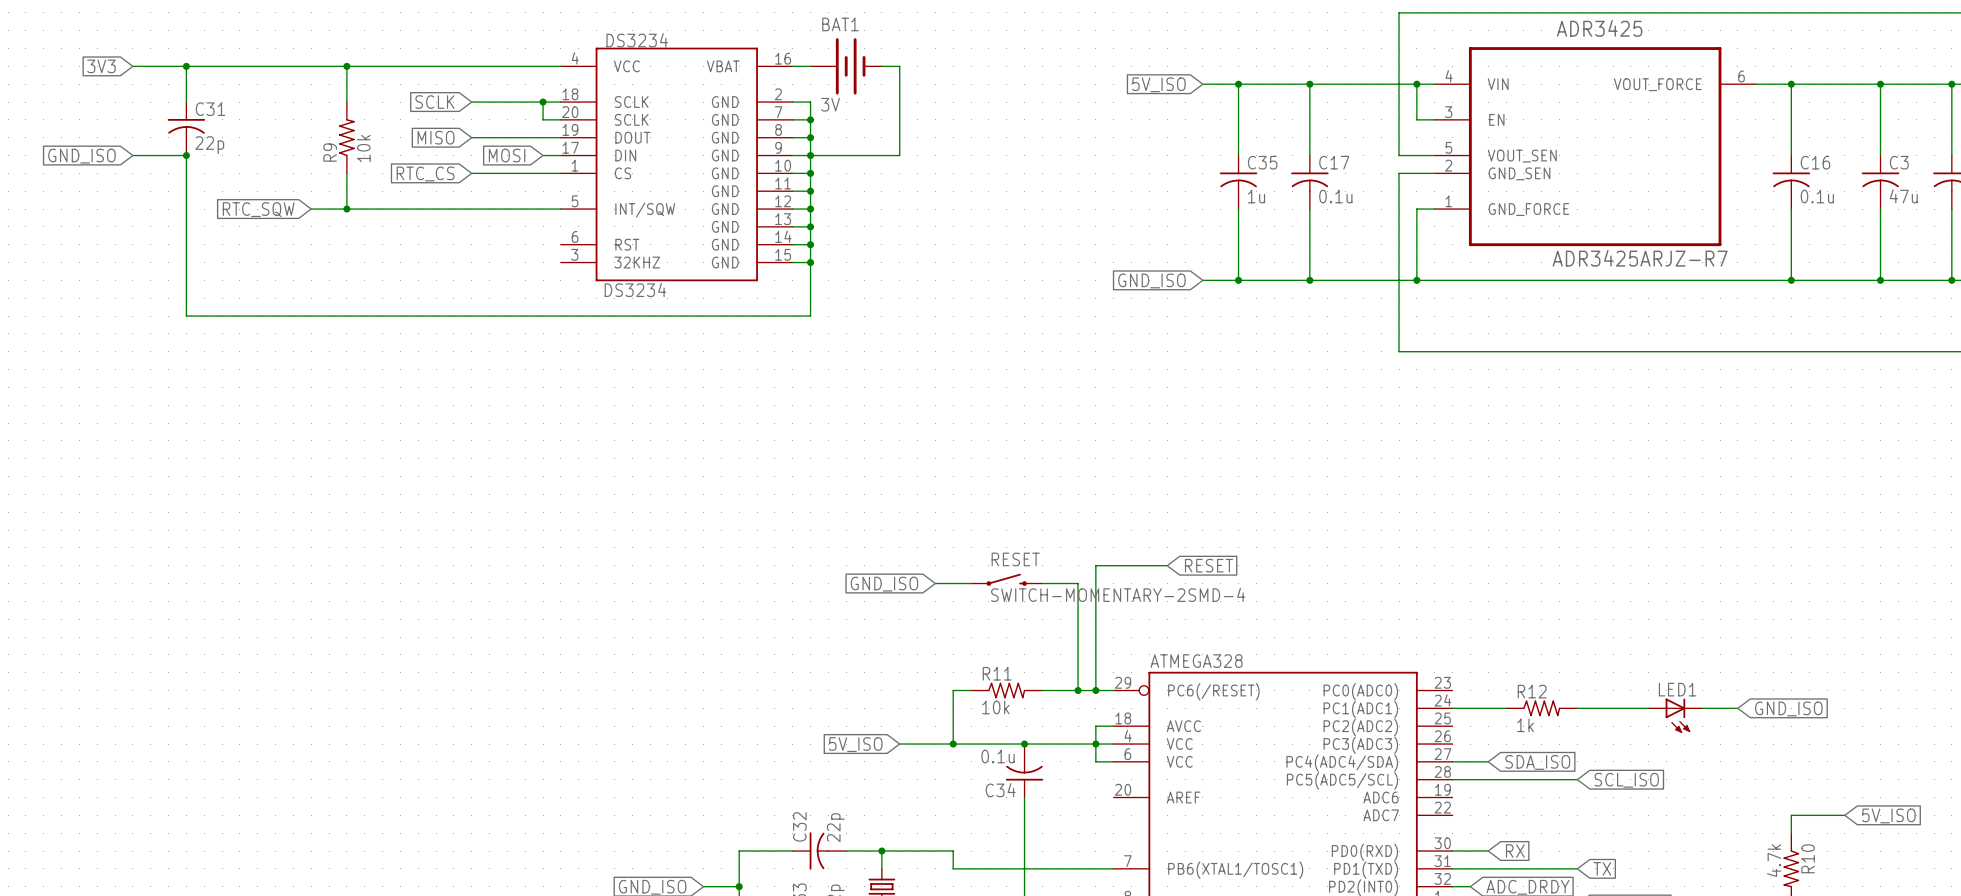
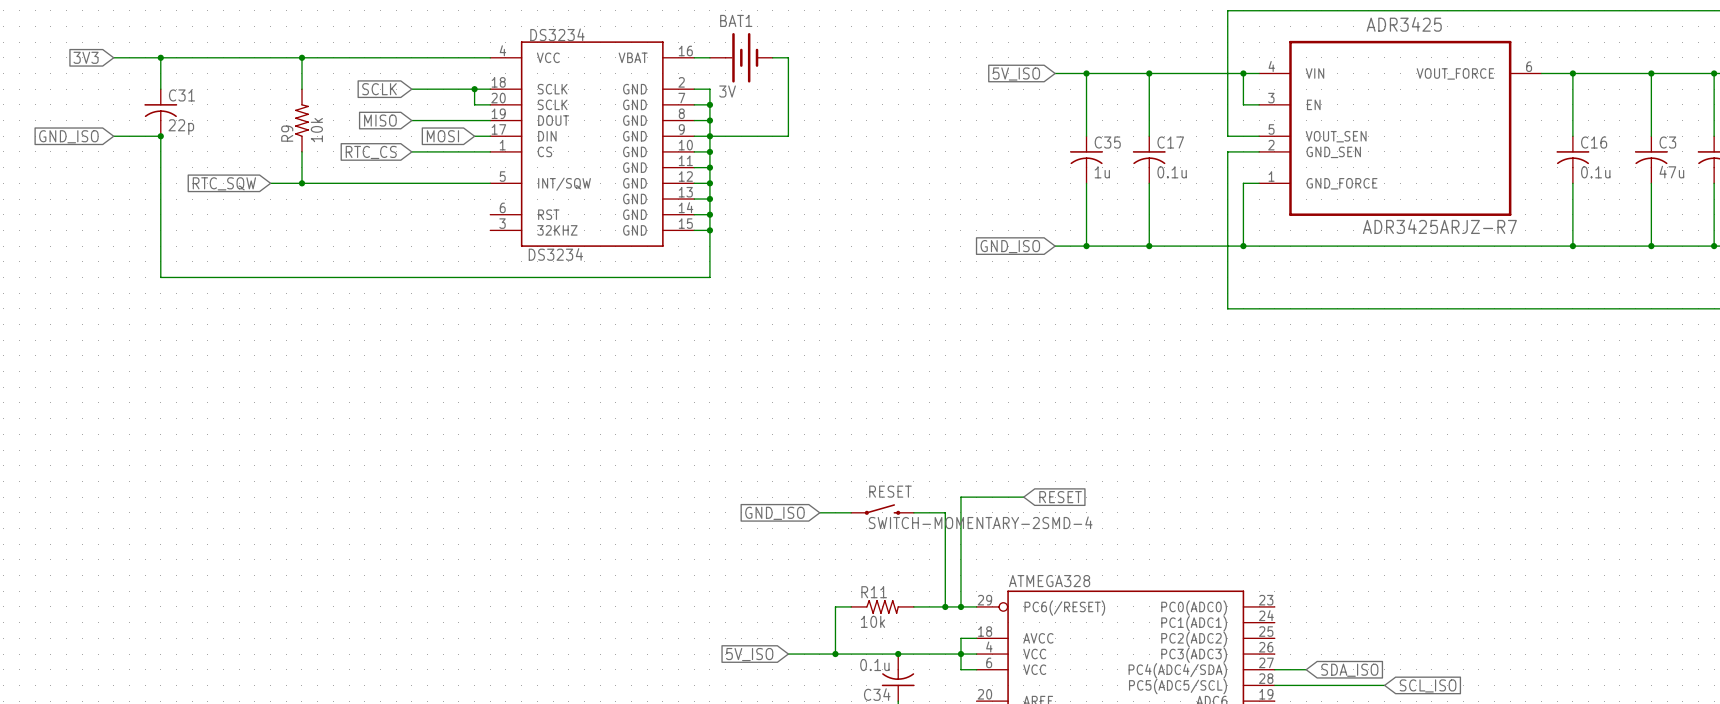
wire: (1452, 708) (1506, 708) -> none
R12: 1k (1541, 708) -> none
wire: (1577, 708) (1648, 708) -> none
wire: (1702, 708) (1737, 708) -> none
global label: GND_ISO (1788, 708) -> none
LED1: (1675, 715) -> none

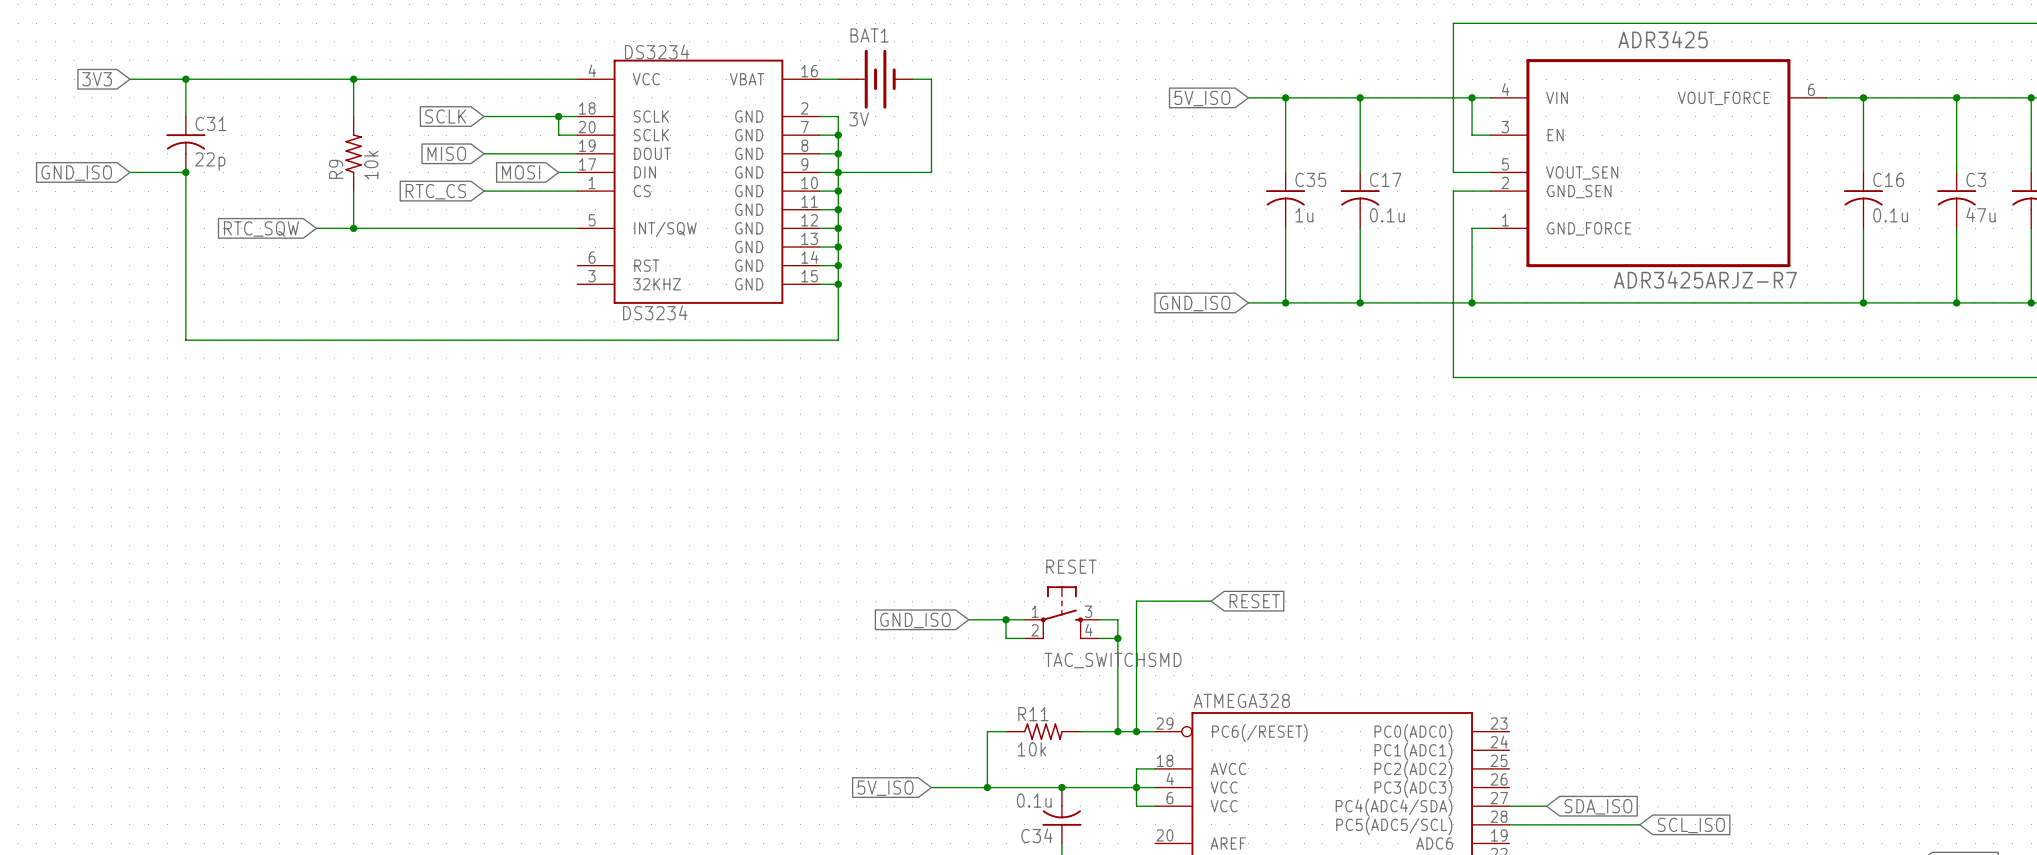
RESET: none -> TAC_SWITCHSMD (1061, 612)
RESET: SWITCH-MOMENTARY-2SMD-4 (882, 509) -> none
junction: none -> (1006, 619)
wire: none -> (1024, 619) (1006, 619) (1006, 638) (1024, 638)
junction: none -> (1117, 638)

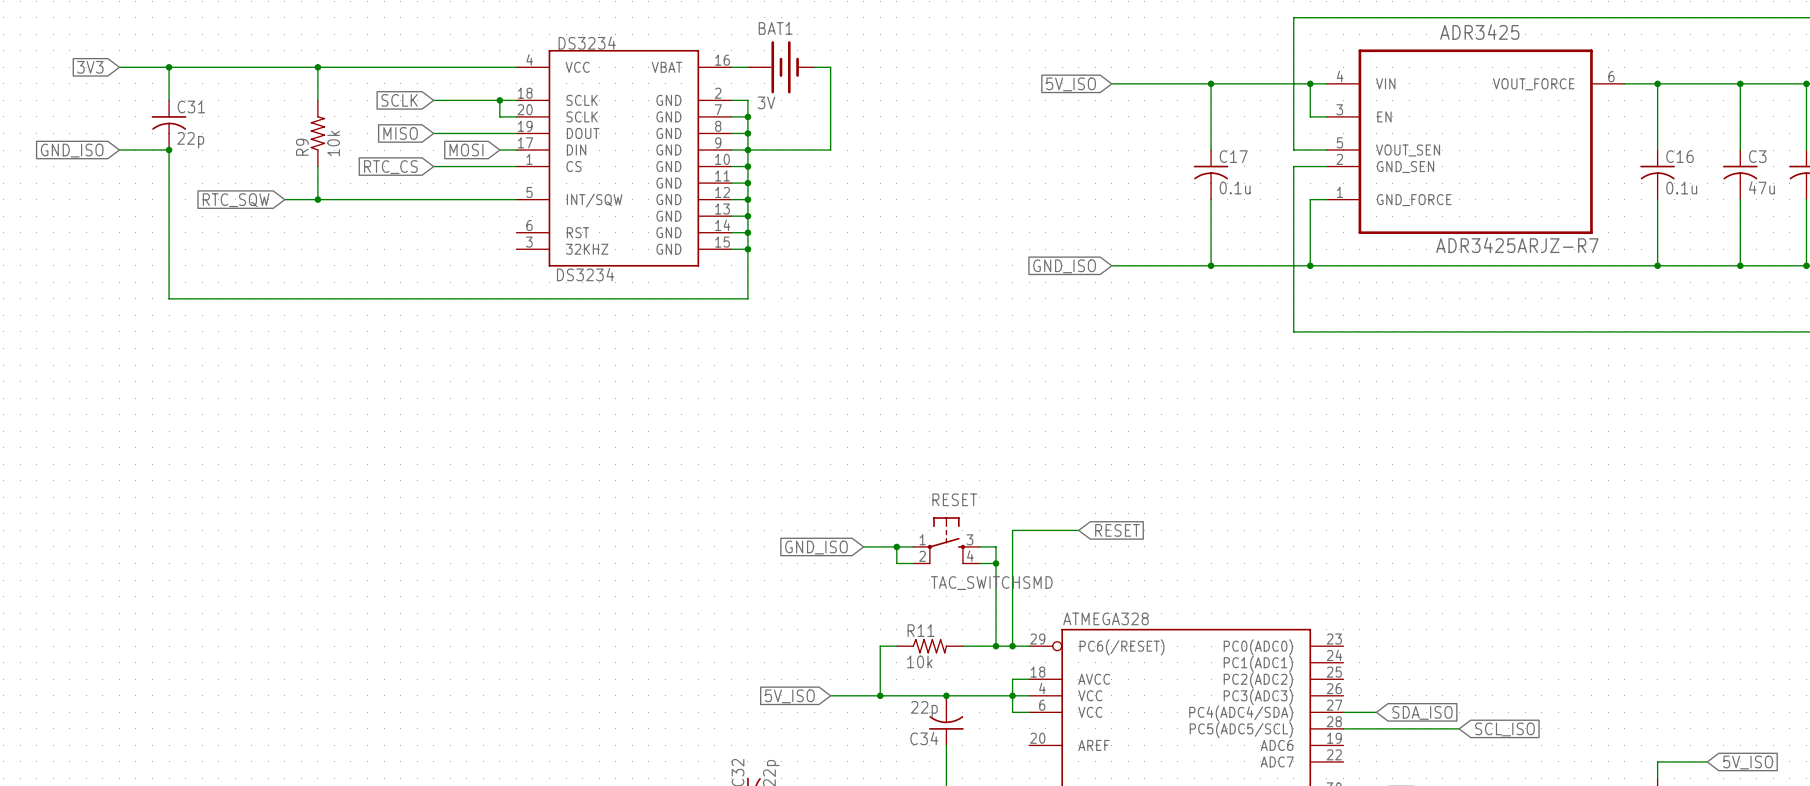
wire: (1285, 97) (1285, 172) -> none
junction: (1285, 97) -> none
C35: 1u (1285, 200) -> none
wire: (1285, 228) (1285, 302) -> none
junction: (1285, 302) -> none
C34 value: 0.1u (1034, 800) -> 22p (924, 709)

